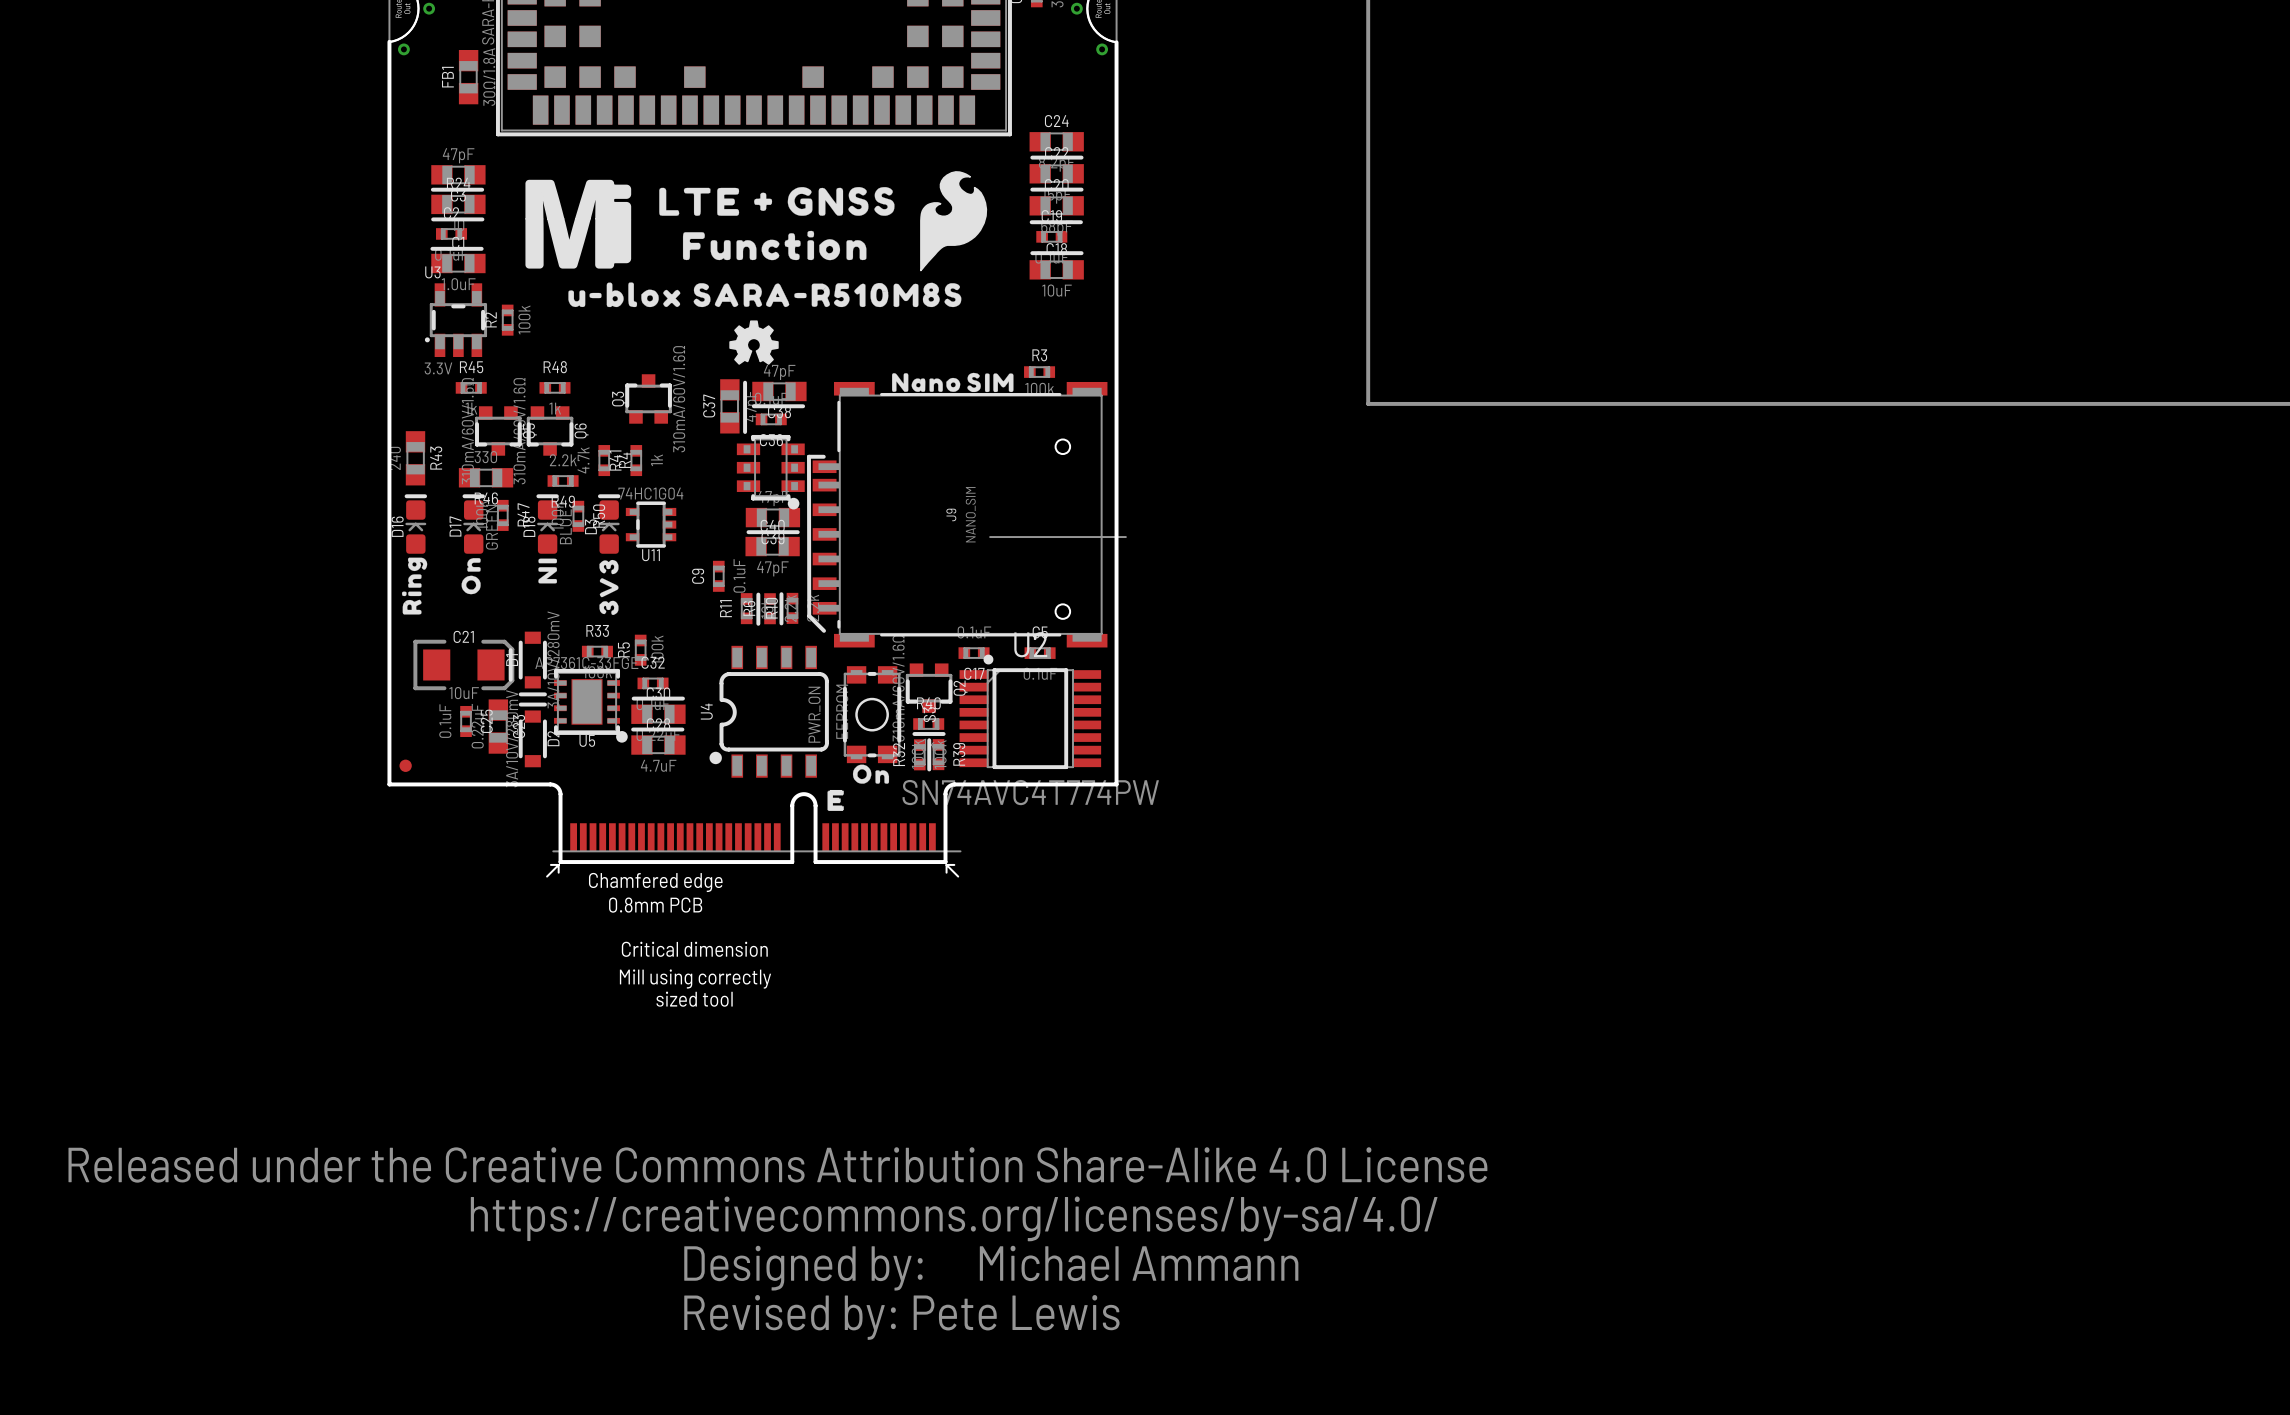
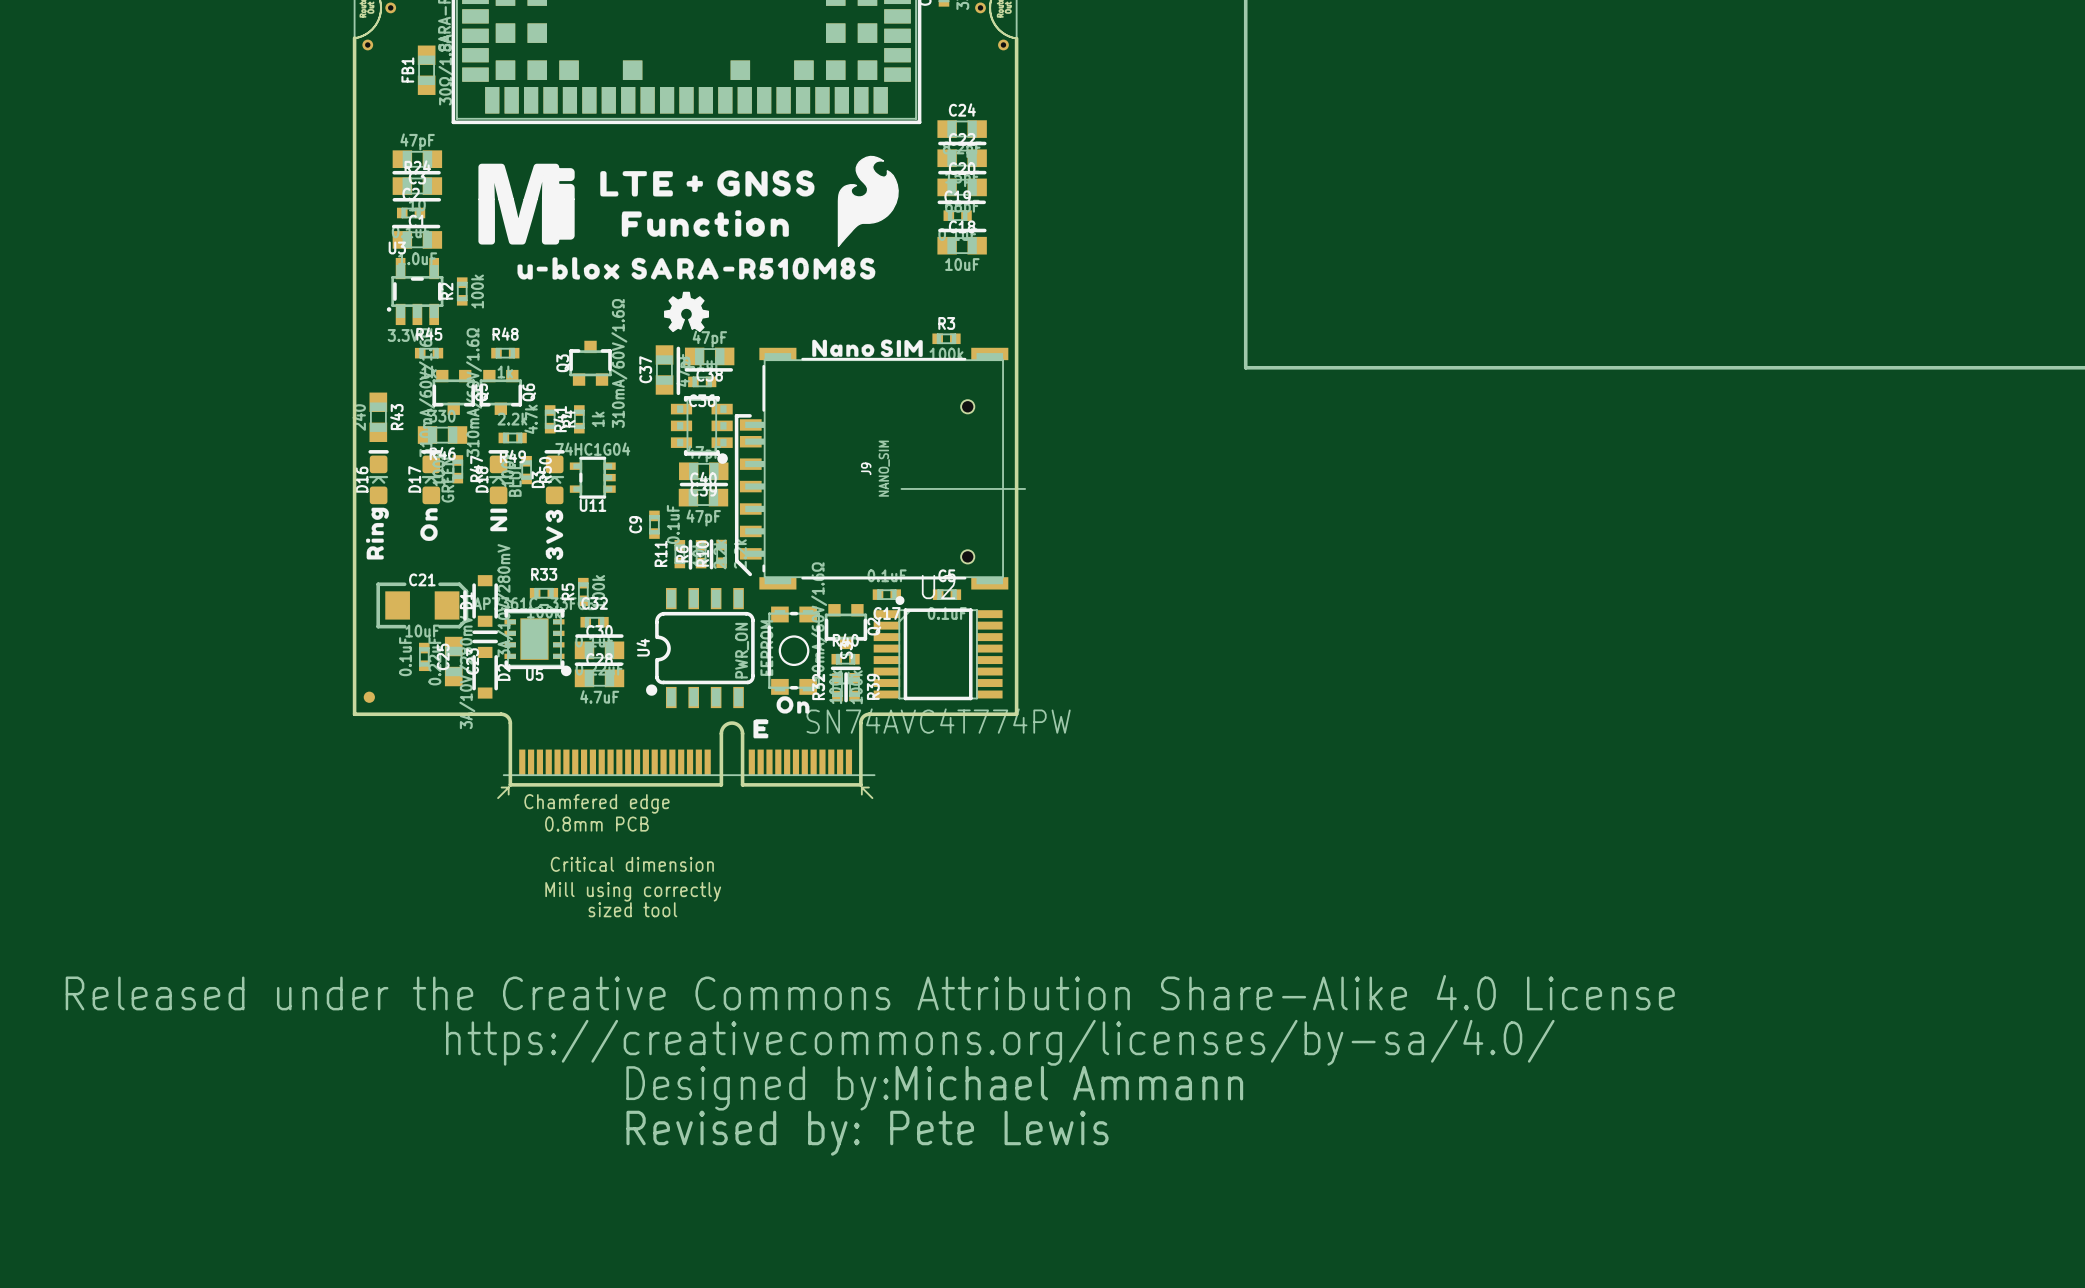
drawing position: (777, 1218) -> (870, 1042)
text position: Michael Ammann (1139, 1263) -> Michael Ammann (1069, 1083)
text position: Revised by: Pete Lewis (901, 1317) -> Revised by: Pete Lewis (867, 1133)

